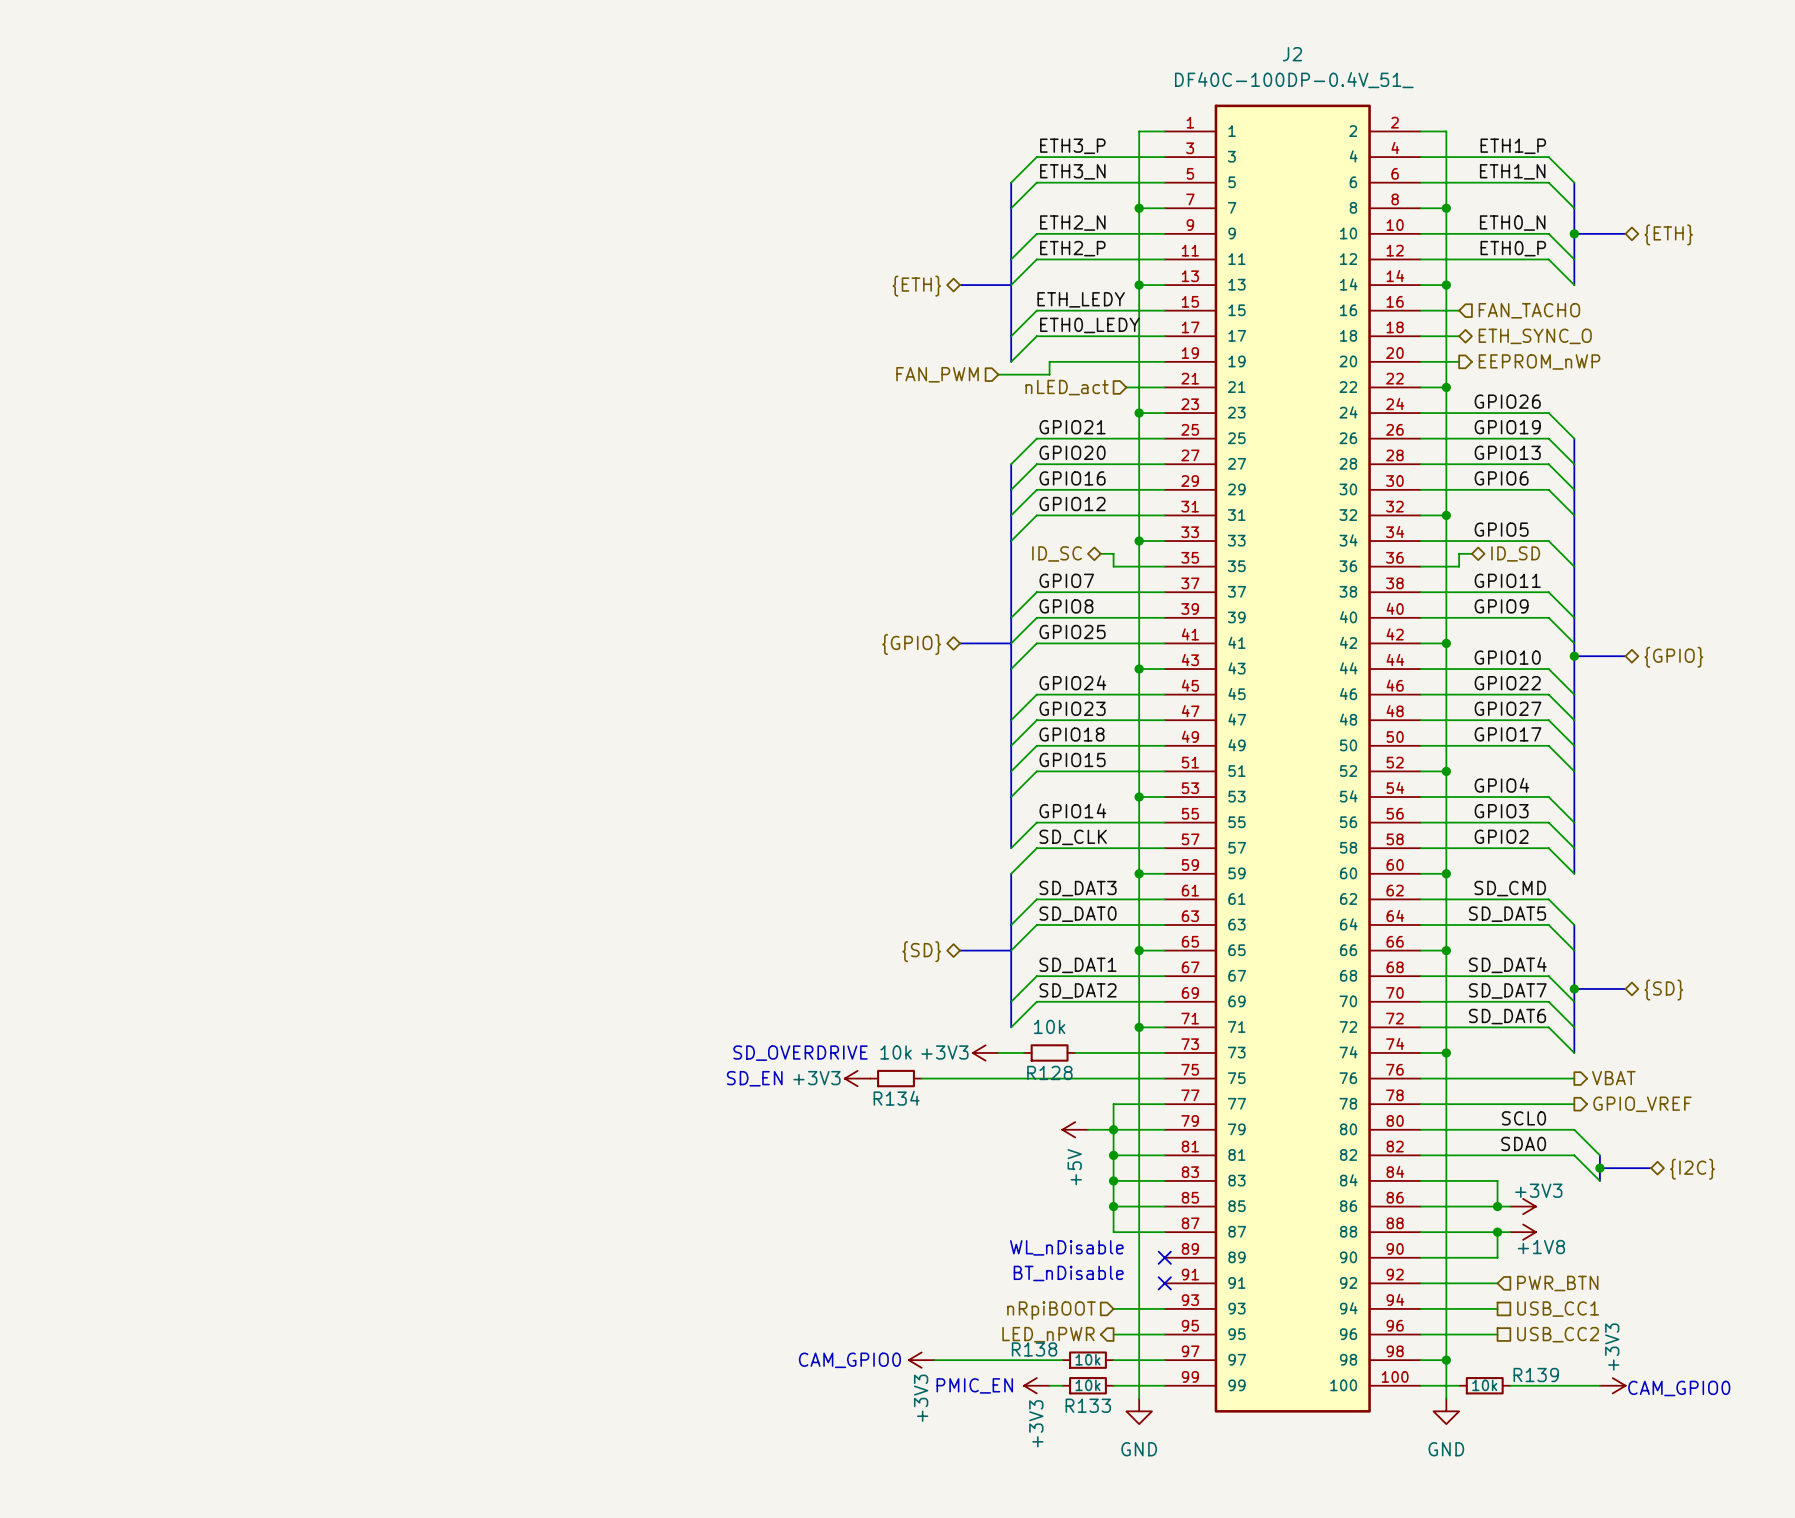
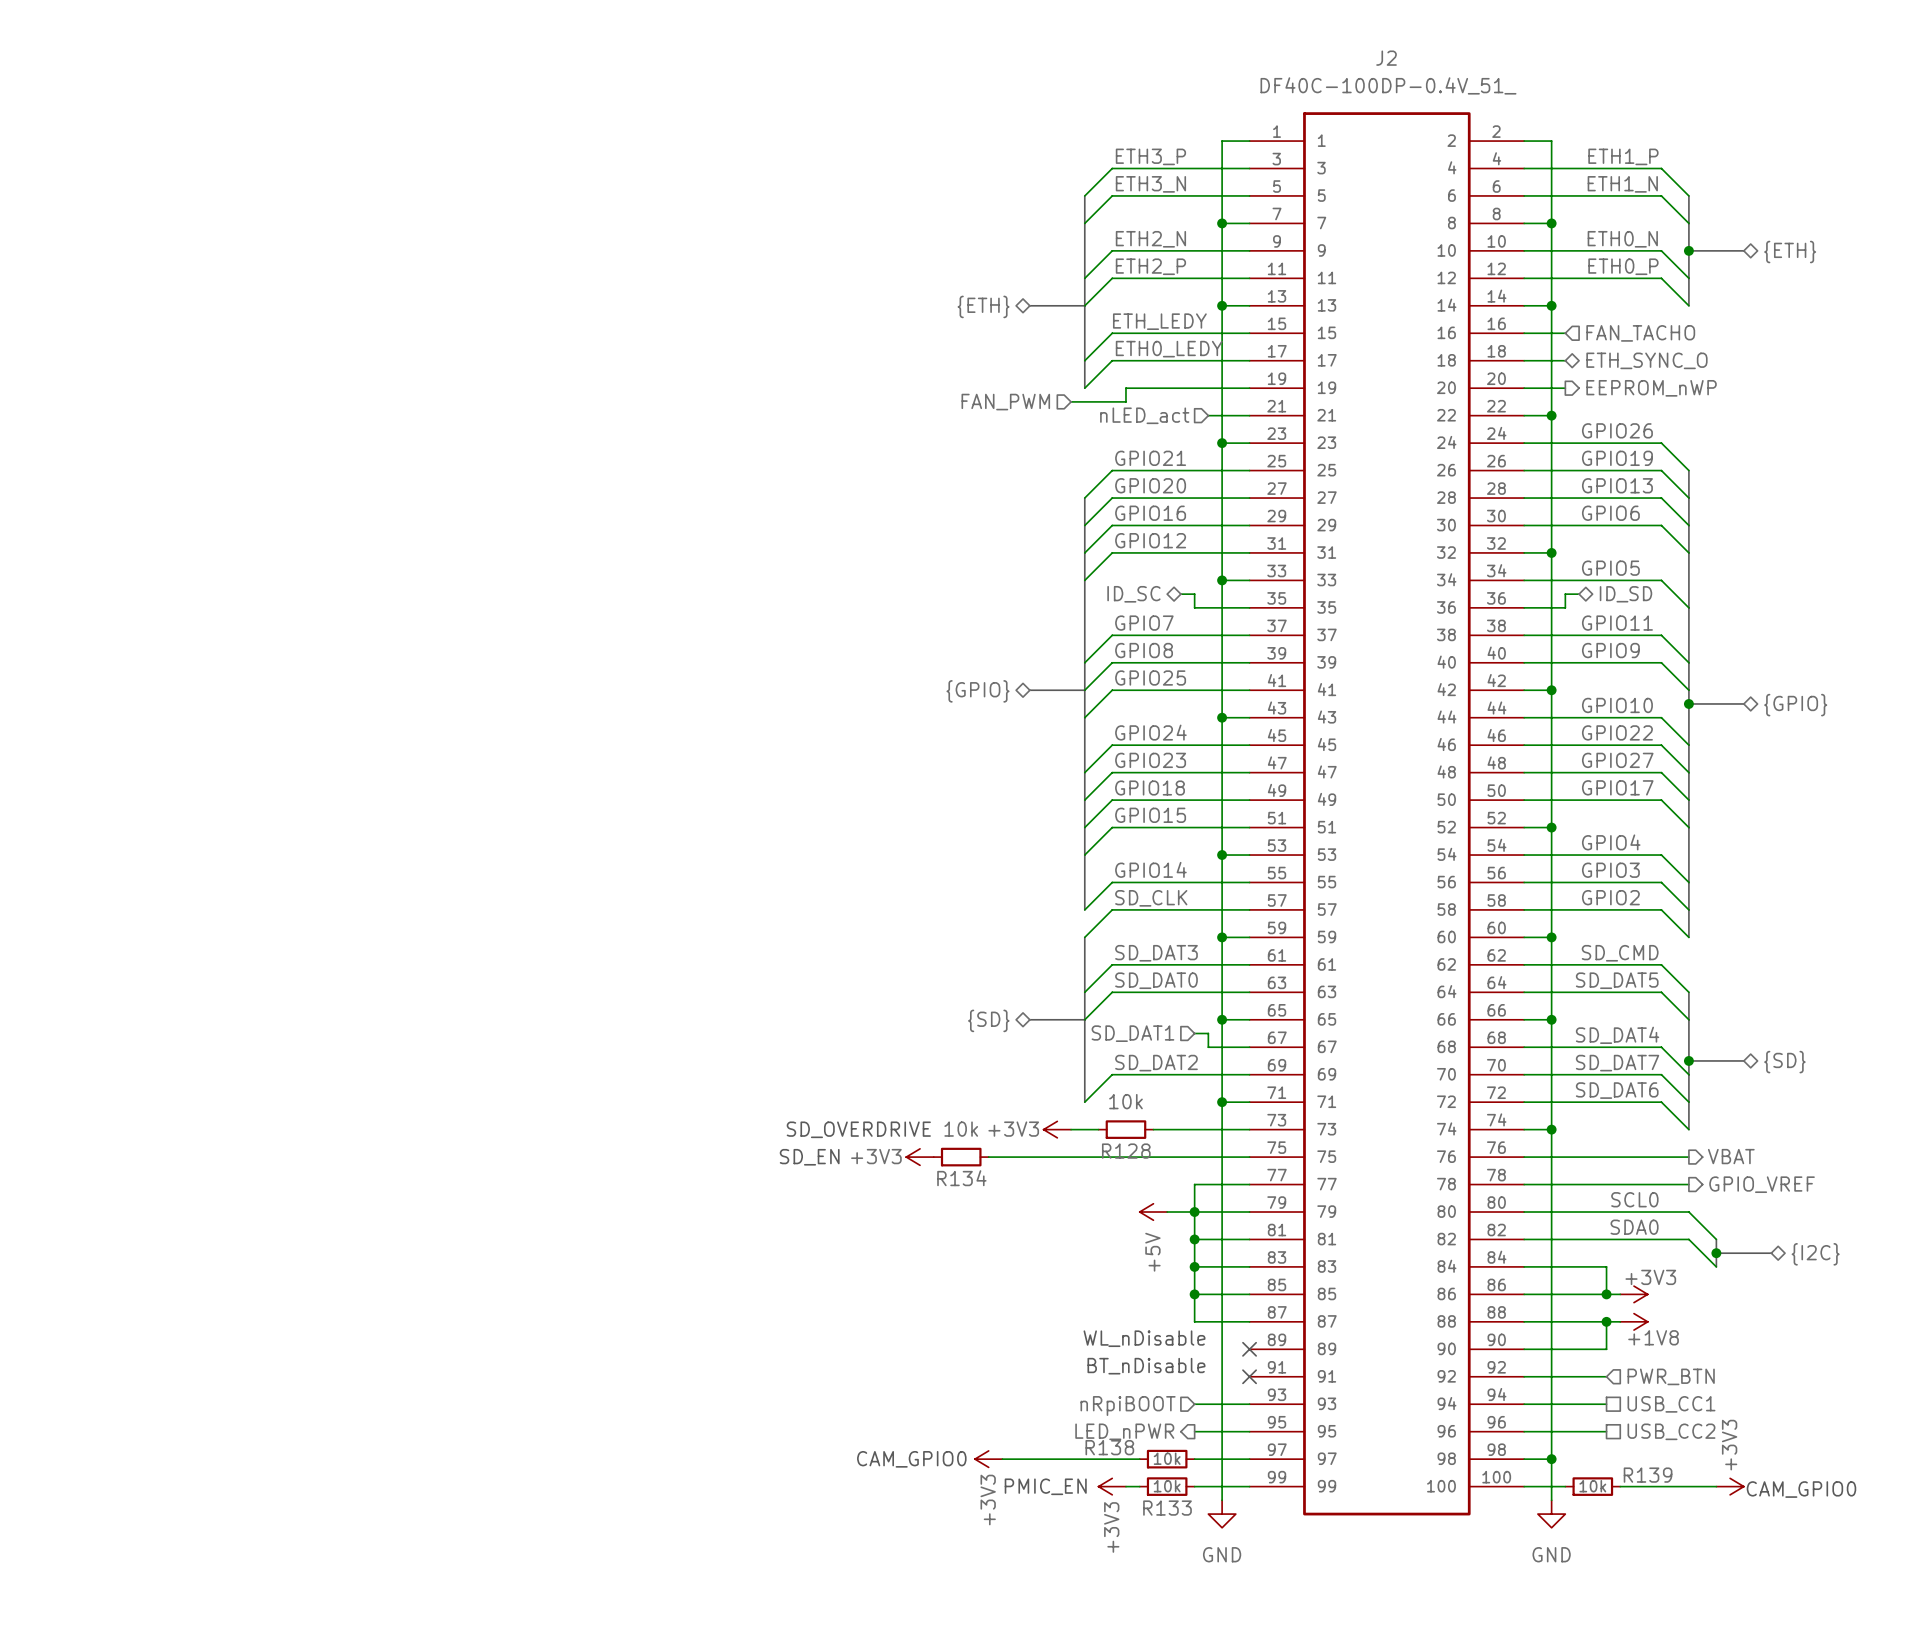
hierarchical label: none -> SD_DAT1 (1132, 1033)
label: SD_DAT1 (1078, 965) -> none
wire: (1126, 976) (1036, 976) (1011, 1001) -> (1208, 1047) (1208, 1033) (1194, 1033)

